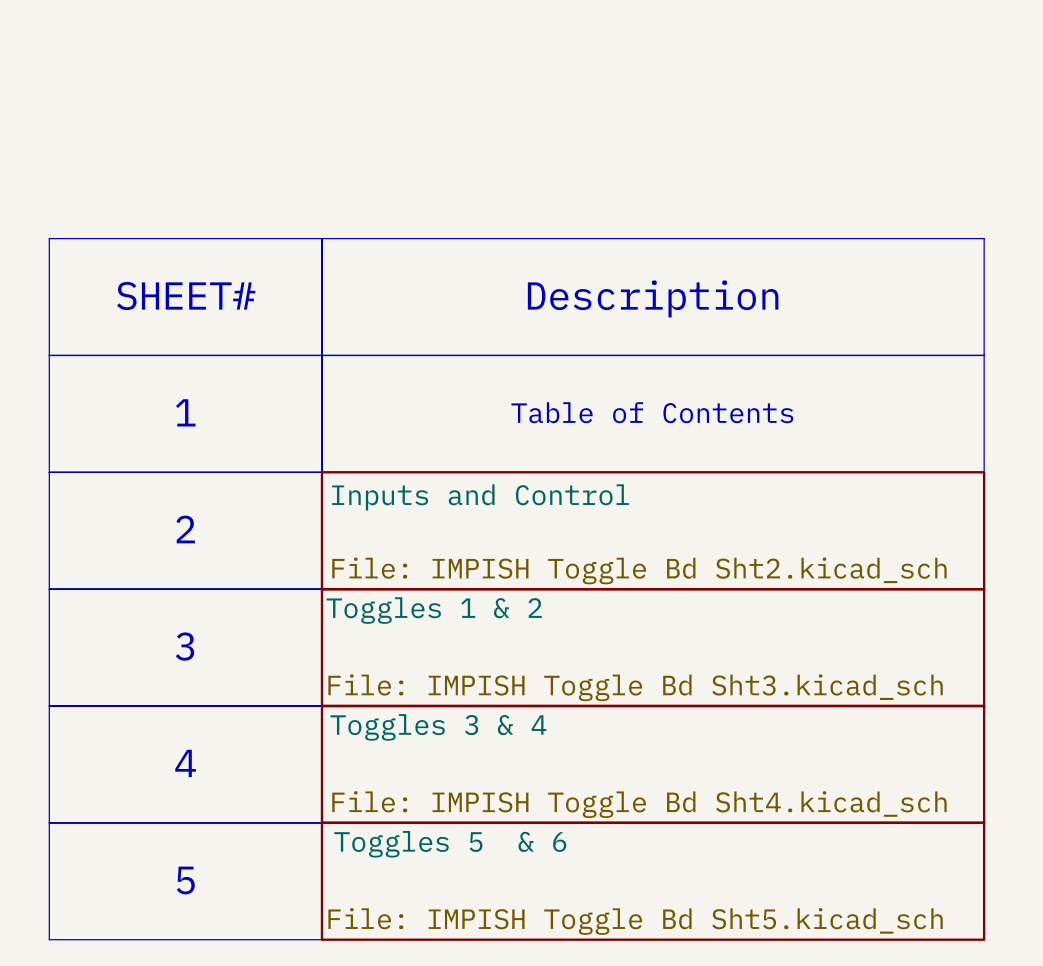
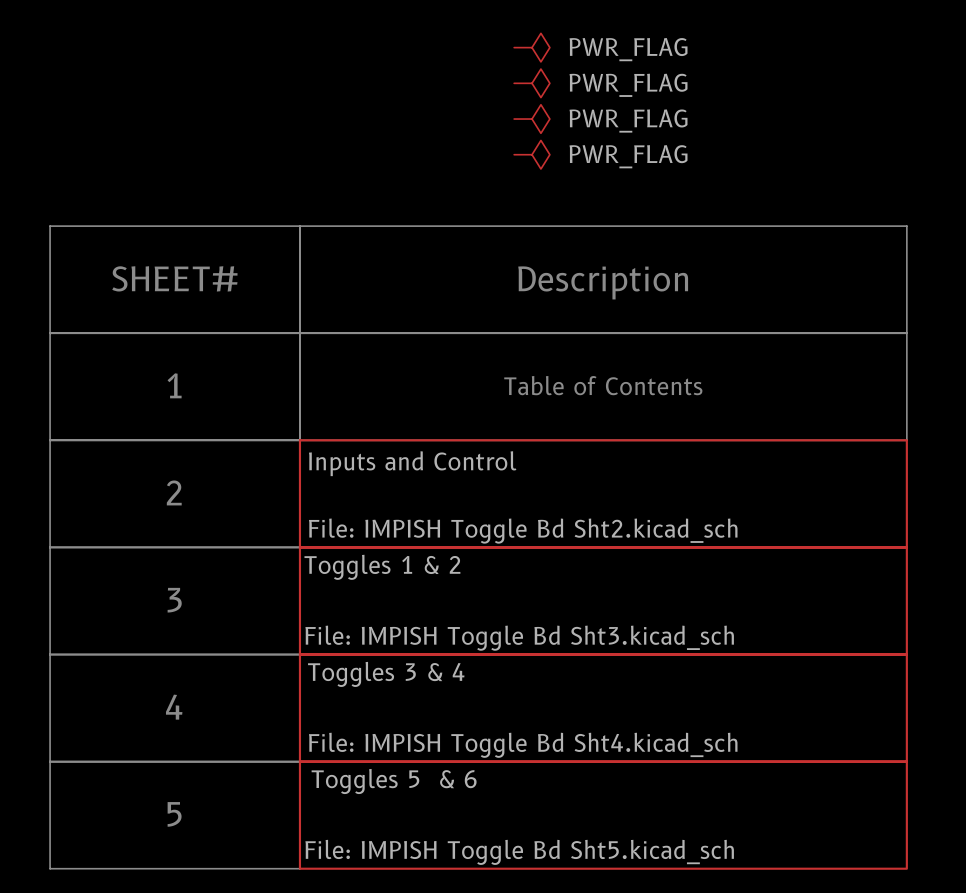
power symbol: none -> PWR_FLAG (532, 47)
power symbol: none -> PWR_FLAG (532, 83)
power symbol: none -> PWR_FLAG (532, 119)
power symbol: none -> PWR_FLAG (532, 154)

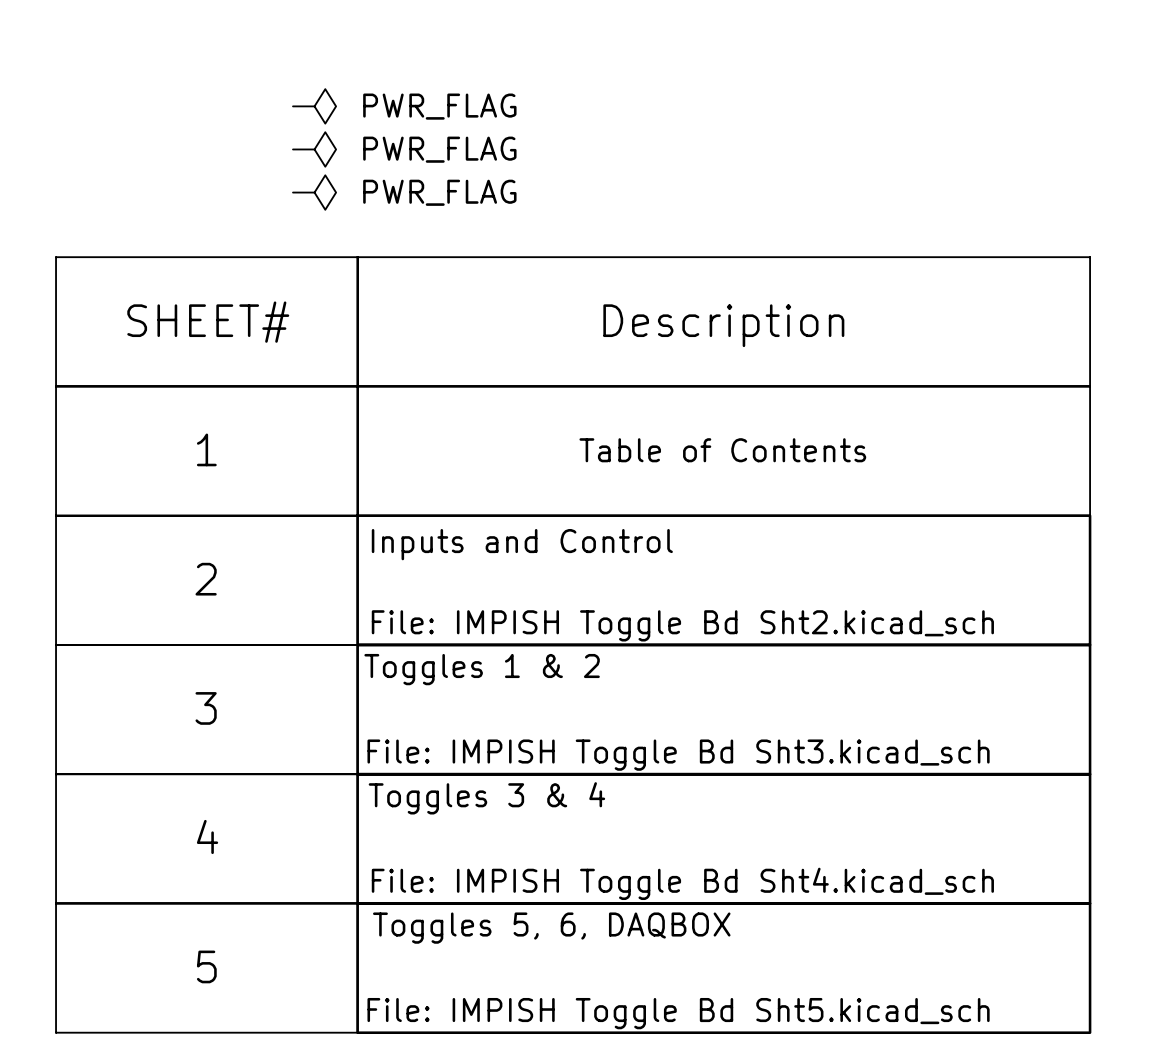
power symbol: PWR_FLAG (532, 47) -> none
power symbol: PWR_FLAG (532, 83) -> none
power symbol: none -> PWR_FLAG (314, 106)
power symbol: PWR_FLAG (532, 119) -> none
power symbol: none -> PWR_FLAG (314, 149)
power symbol: PWR_FLAG (532, 154) -> none
power symbol: none -> PWR_FLAG (314, 192)
sheet Toggles 5 & 6 name: Toggles 5 & 6 (394, 781) -> Toggles 5, 6, DAQBOX (551, 928)

